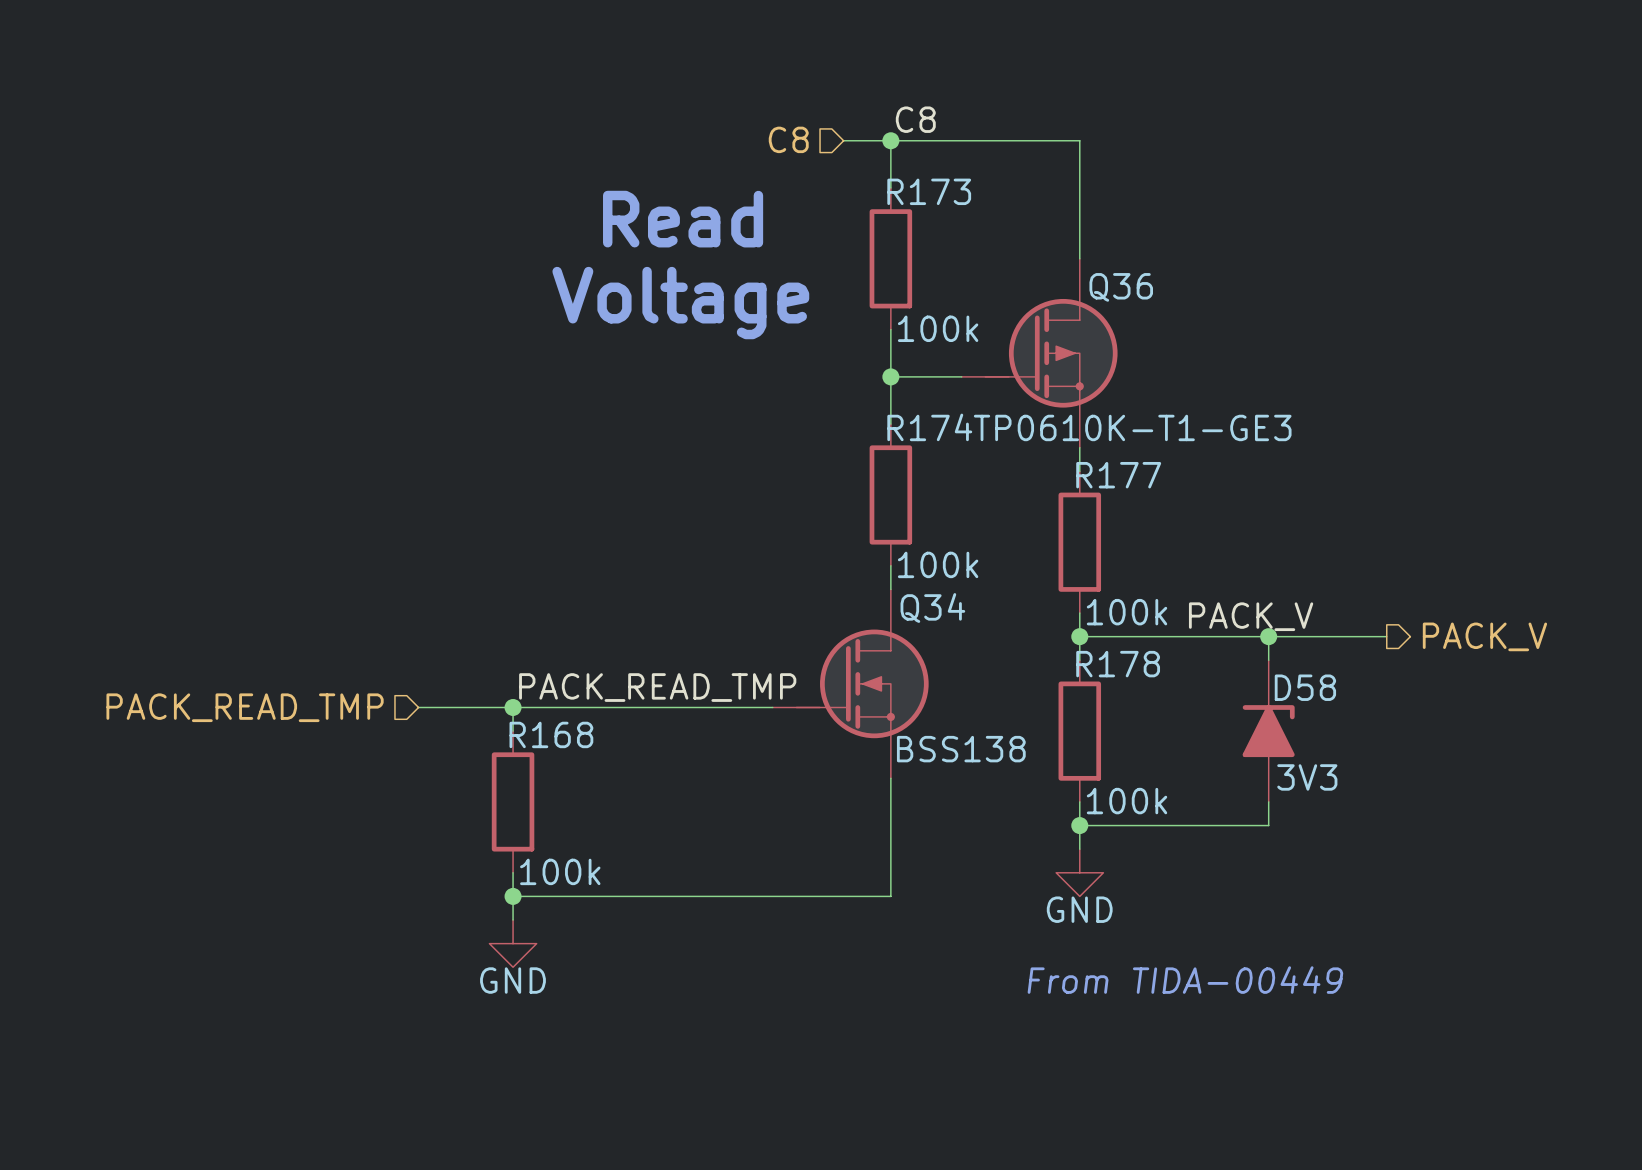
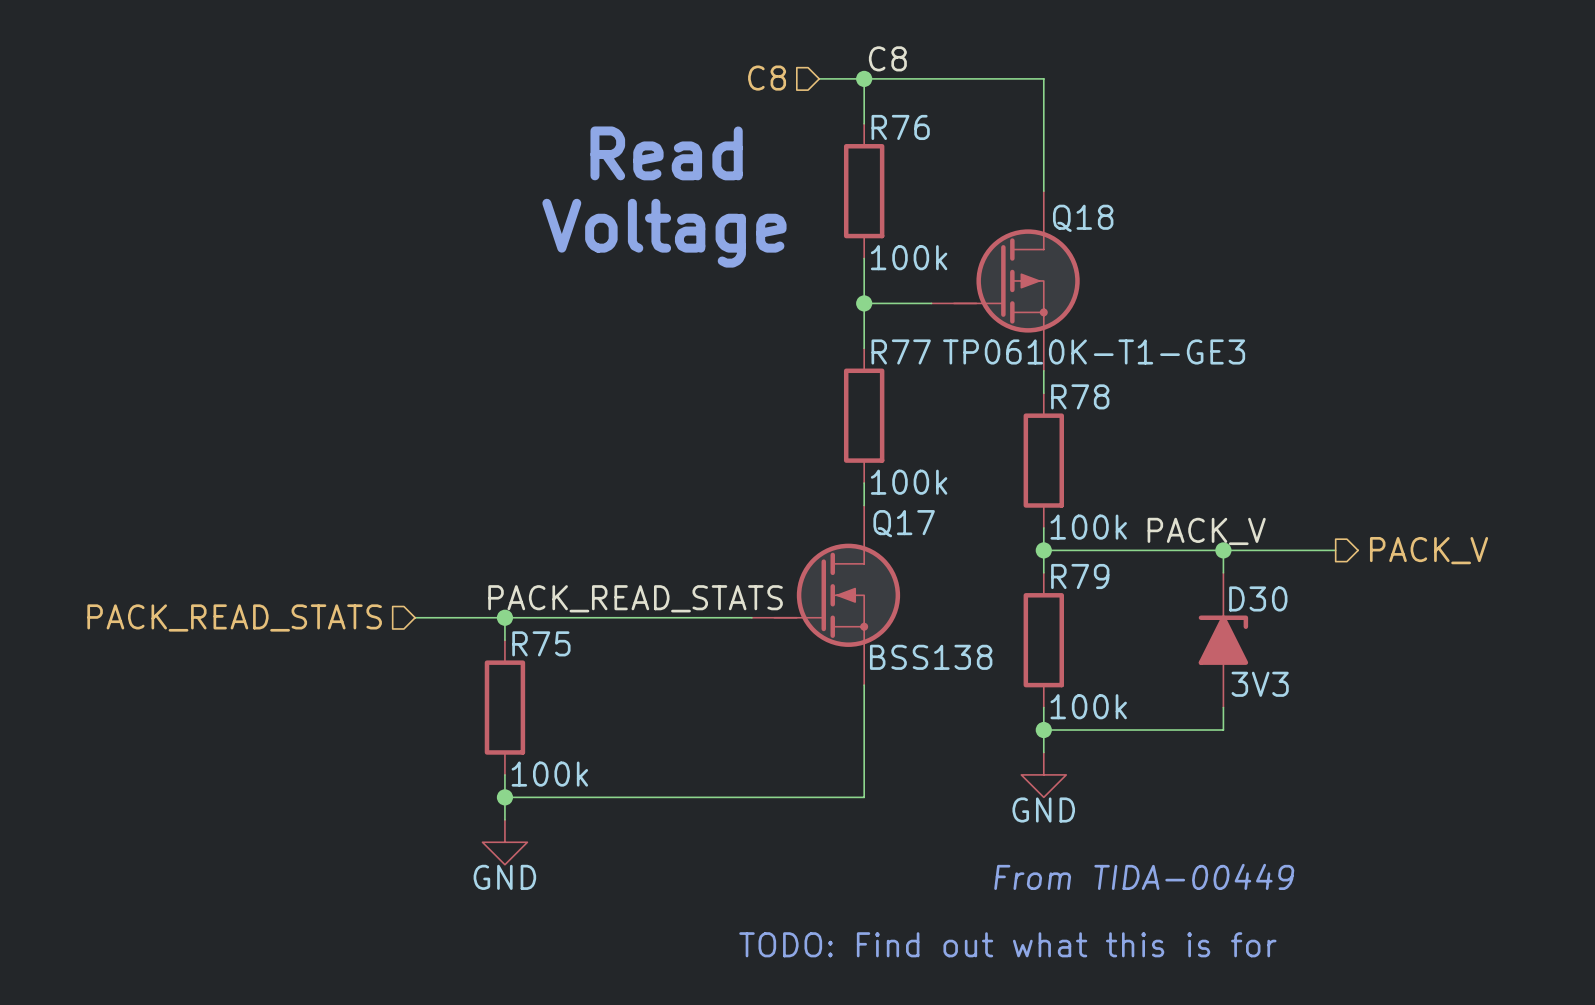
R173 name: R173 (929, 191) -> R76 (900, 127)
Q36 name: Q36 (1121, 287) -> Q18 (1083, 218)
R174 name: R174 (929, 427) -> R77 (901, 351)
R177 name: R177 (1118, 475) -> R78 (1080, 396)
Q34 name: Q34 (932, 607) -> Q17 (904, 523)
R178 name: R178 (1118, 664) -> R79 (1080, 576)
label: PACK_READ_TMP (657, 687) -> PACK_READ_STATS (635, 598)
D58 name: D58 (1305, 687) -> D30 (1258, 598)
hierarchical label: PACK_READ_TMP (245, 707) -> PACK_READ_STATS (234, 617)
R168 name: R168 (551, 734) -> R75 (541, 643)
text: none -> TODO: Find out what this is for (1007, 944)

